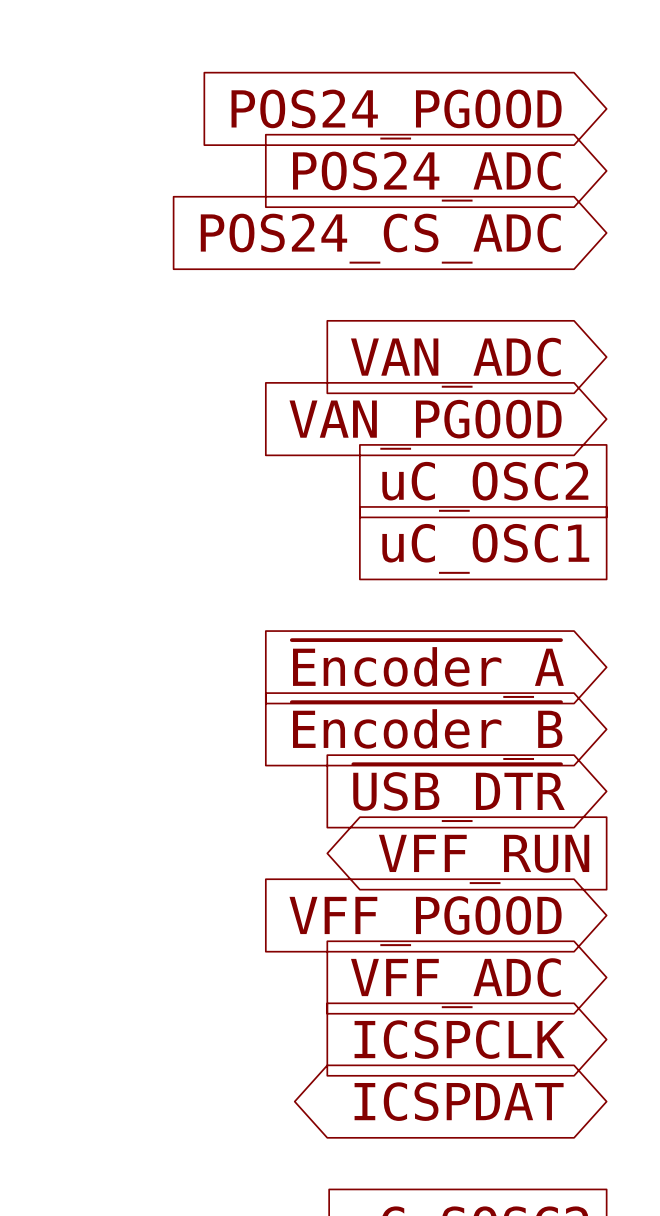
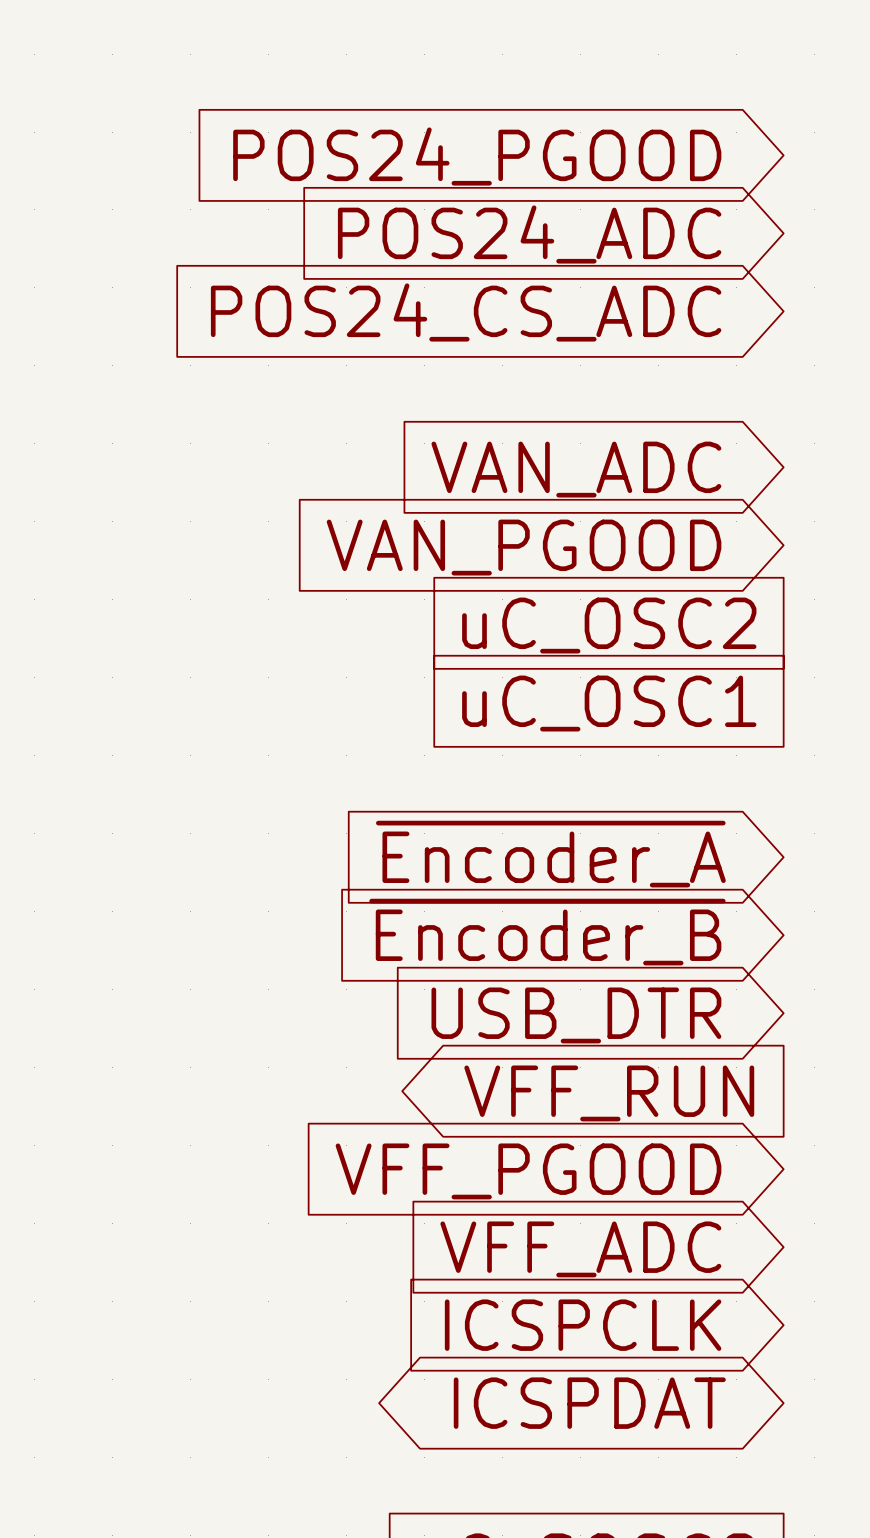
global label: ~{USB_DTR} (459, 793) -> USB_DTR (576, 1015)

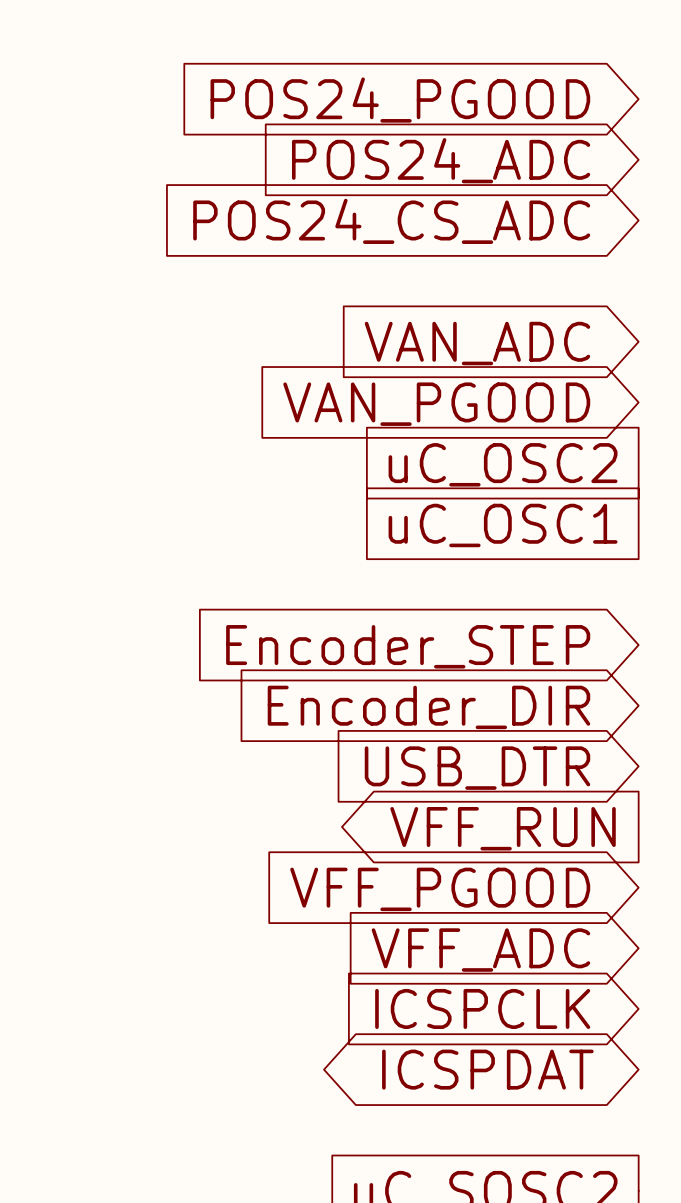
global label: ~{Encoder_A} (550, 854) -> Encoder_STEP (408, 646)
global label: ~{Encoder_B} (547, 932) -> Encoder_DIR (428, 707)

